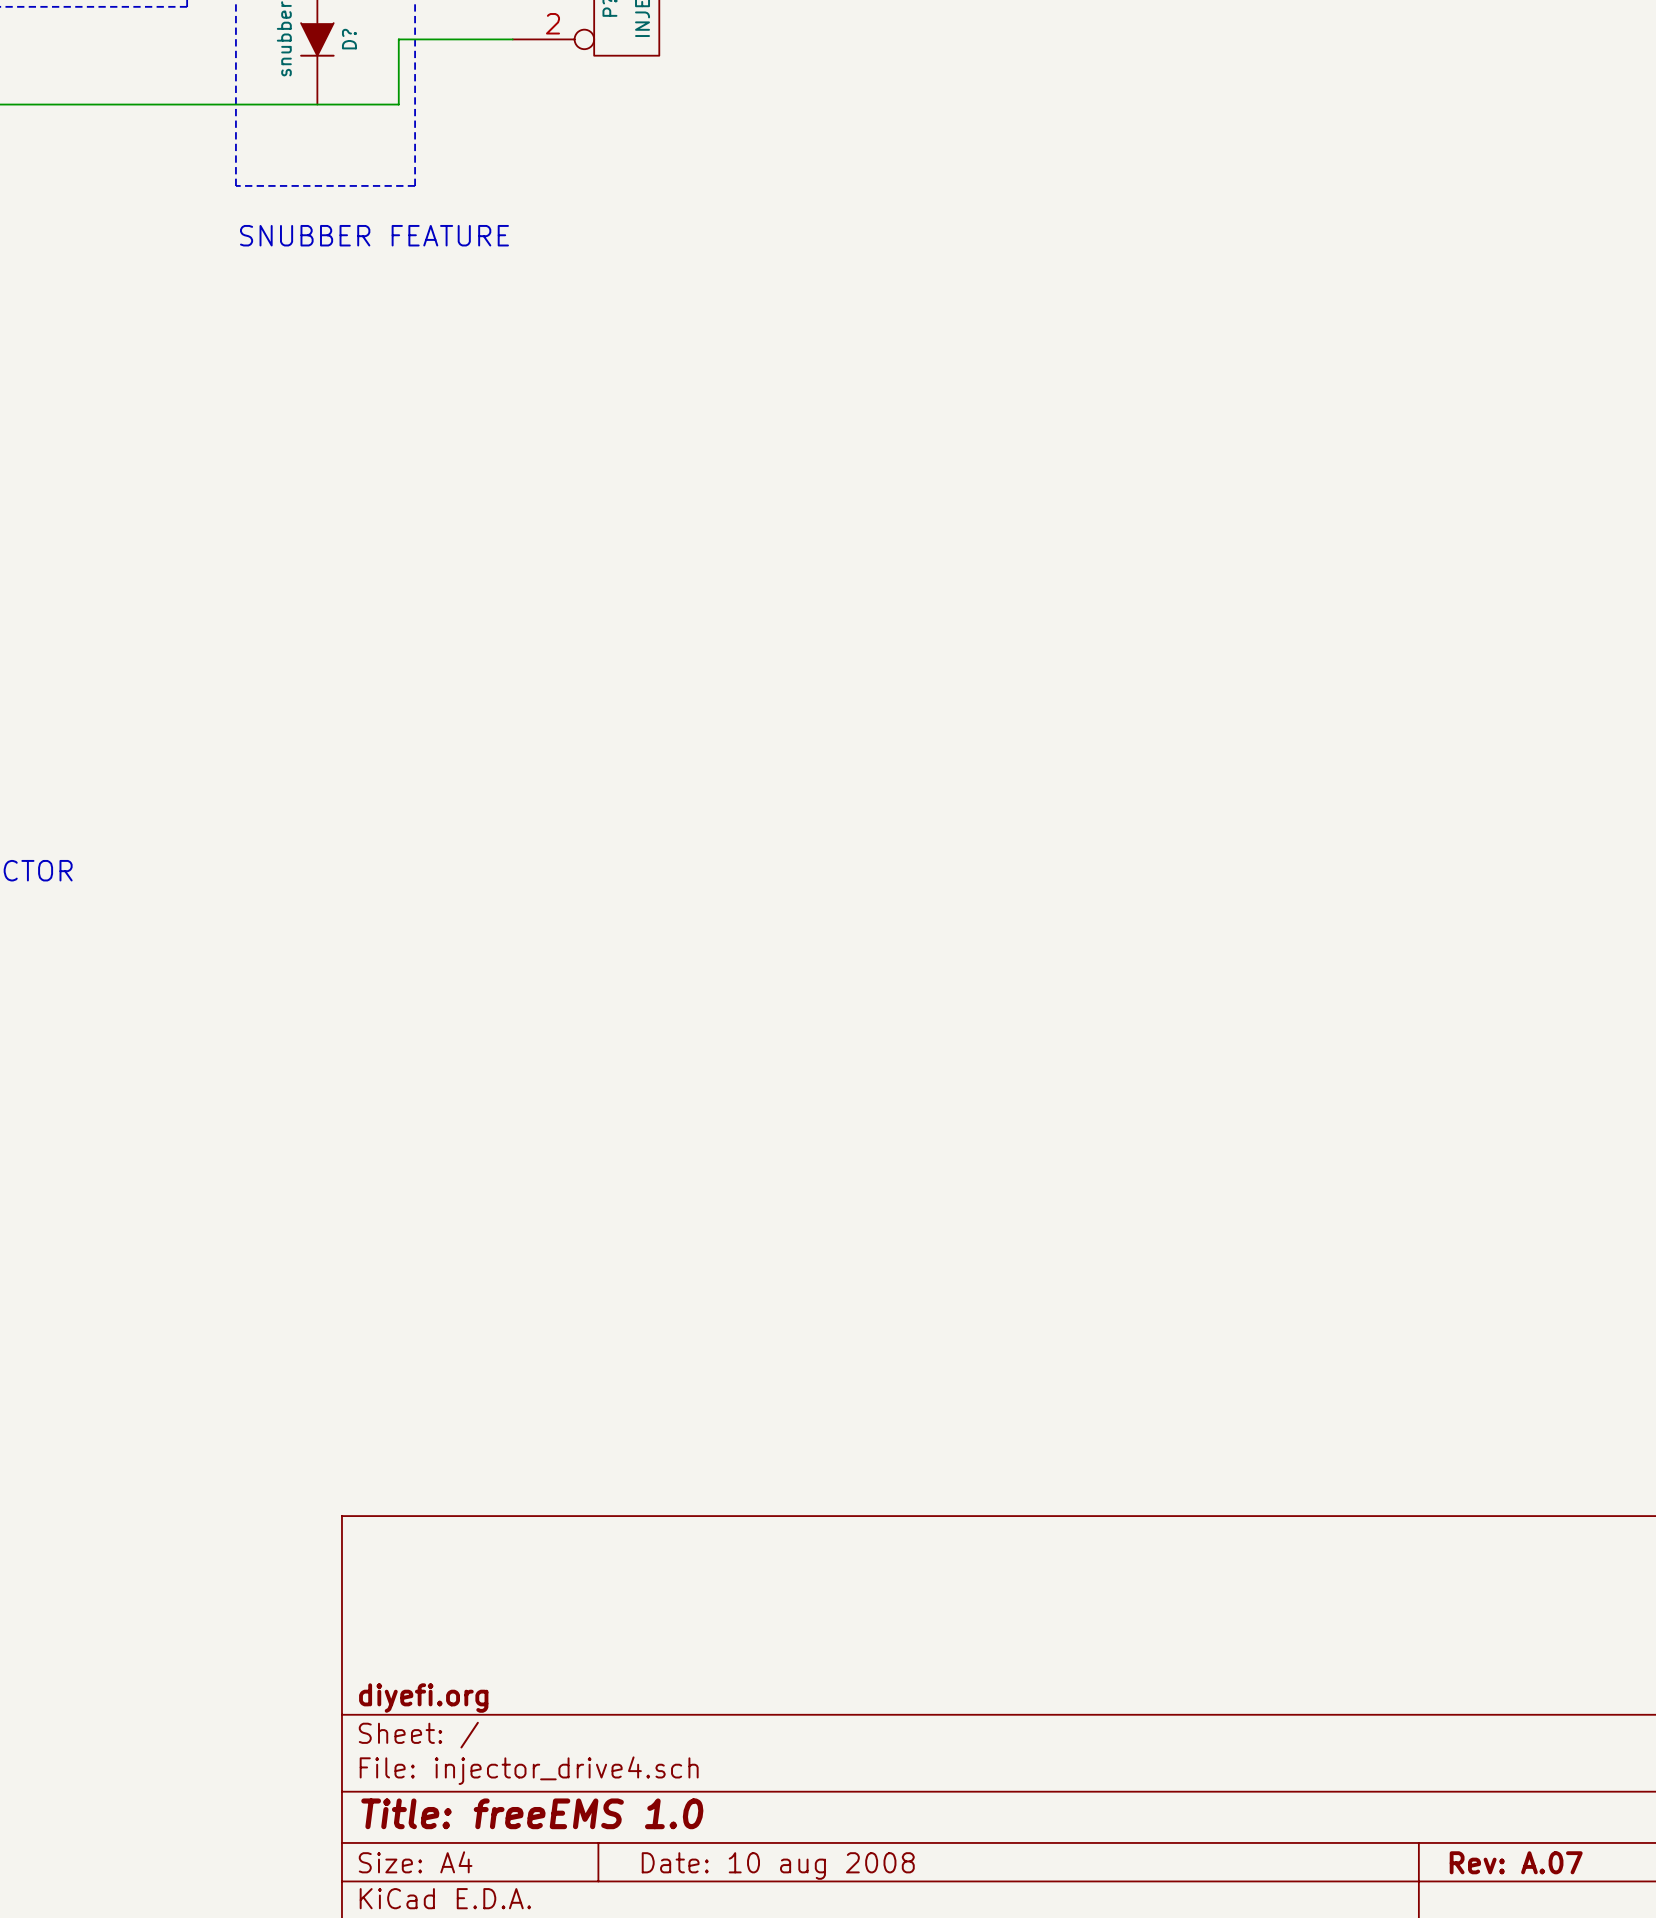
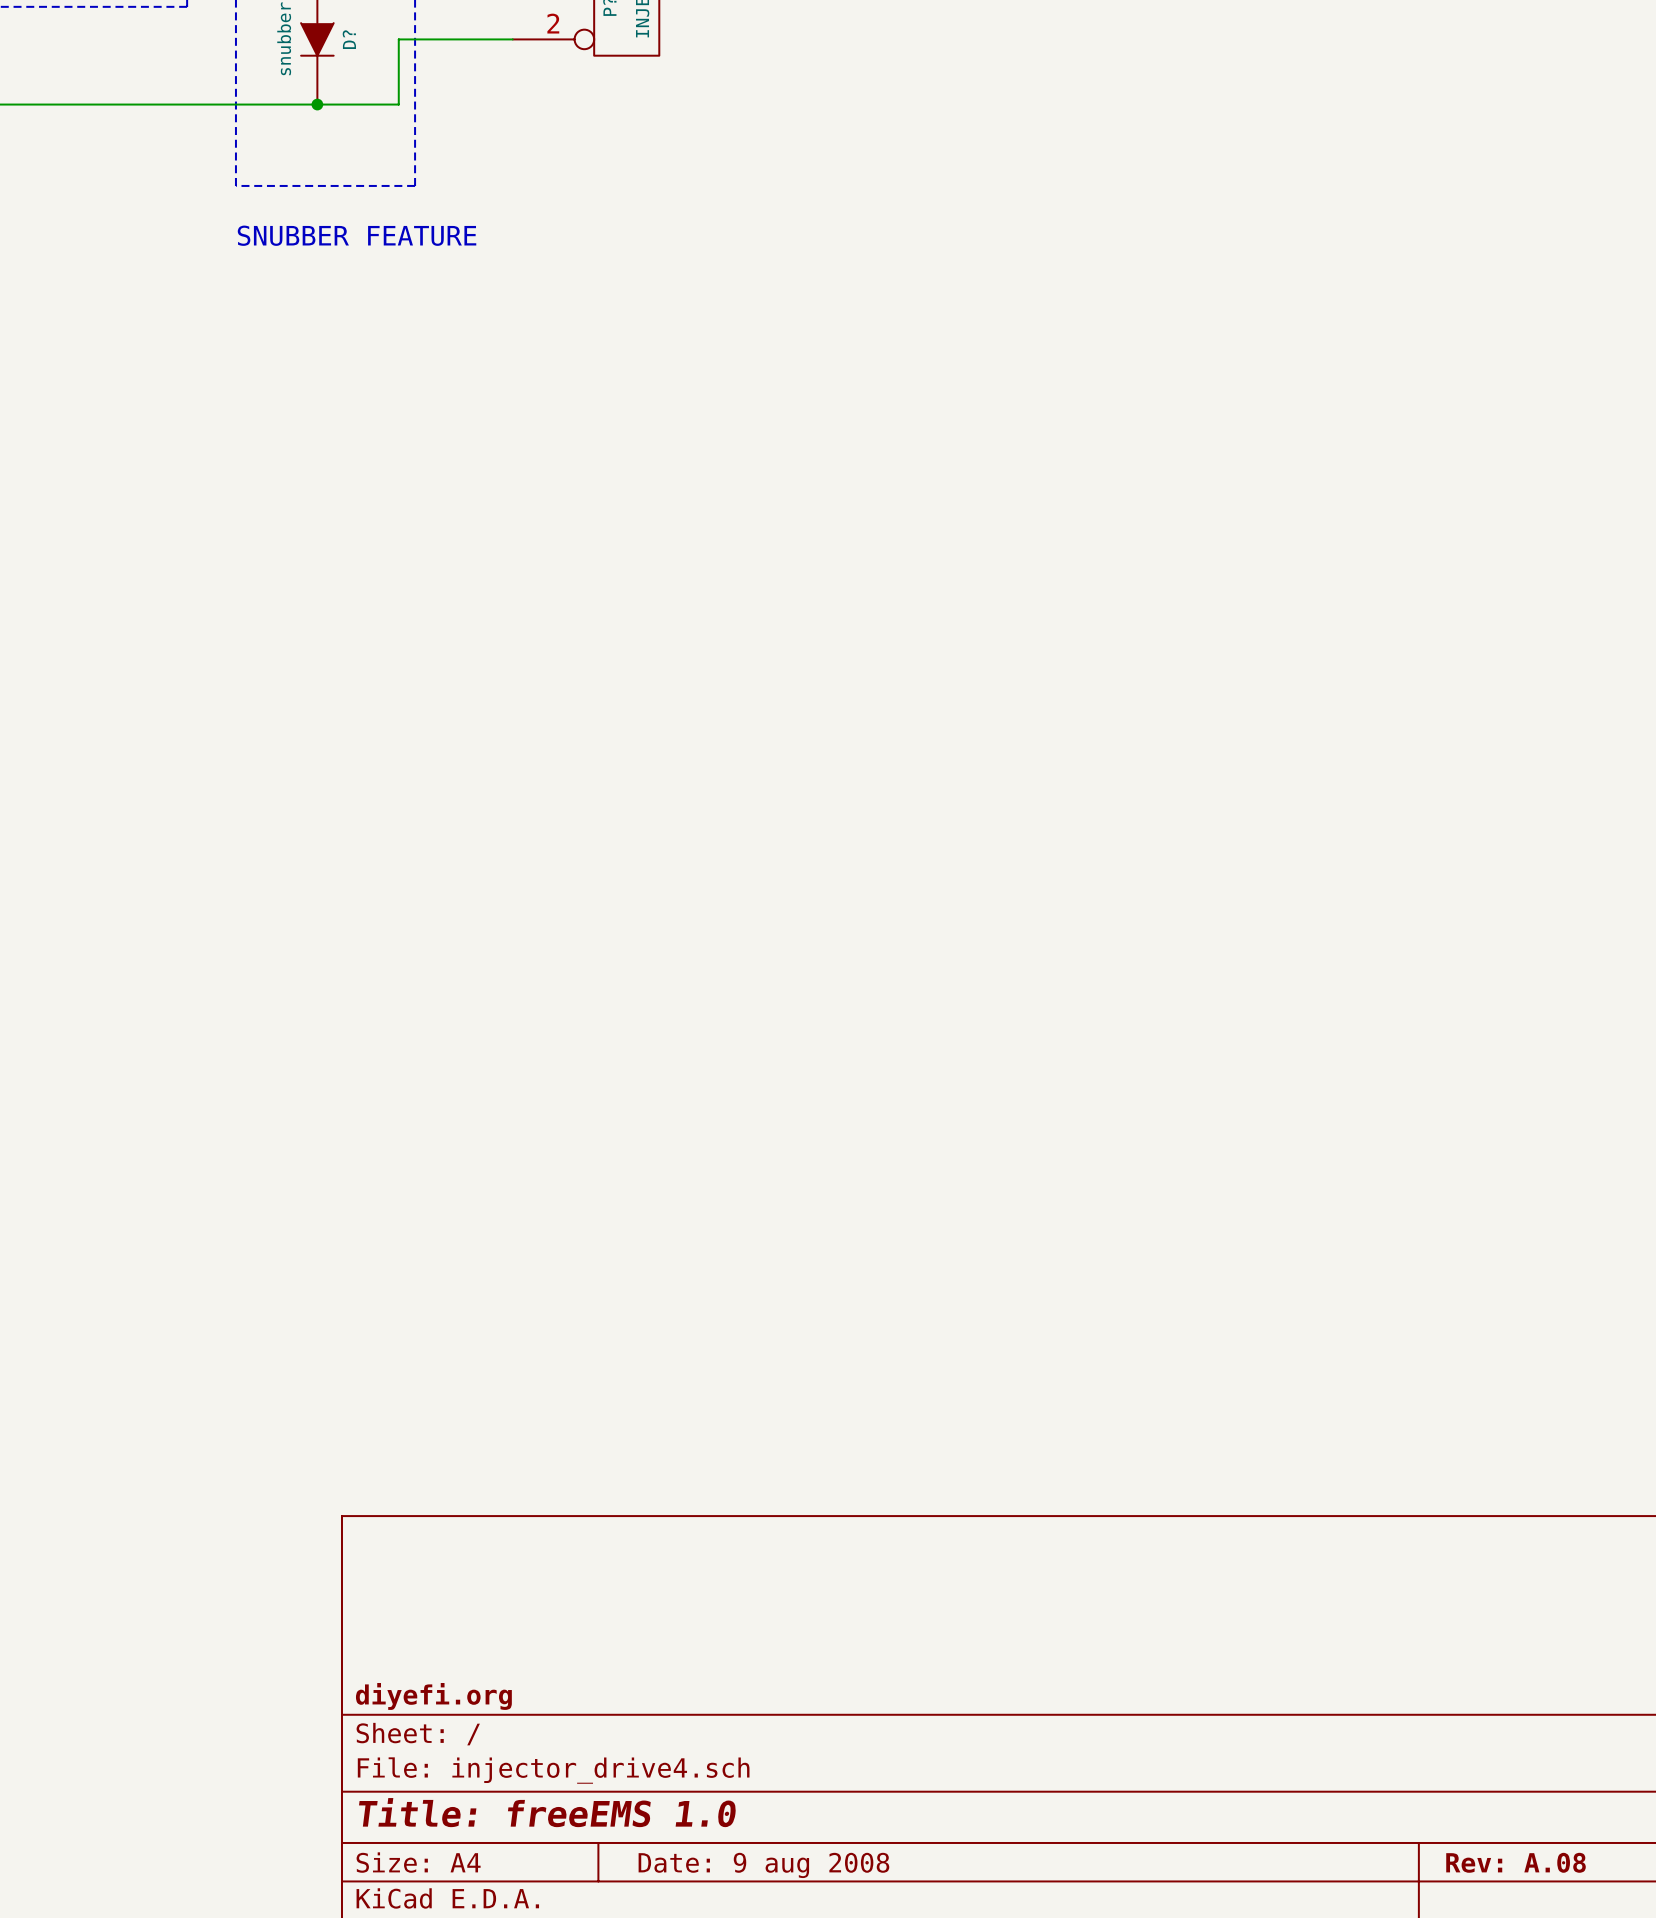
junction: none -> (317, 104)
title block: Rev: A.07 (1516, 1862) -> Rev: A.08 (1516, 1862)
title block: Date: 10 aug 2008 (778, 1865) -> Date: 9 aug 2008 (763, 1865)

